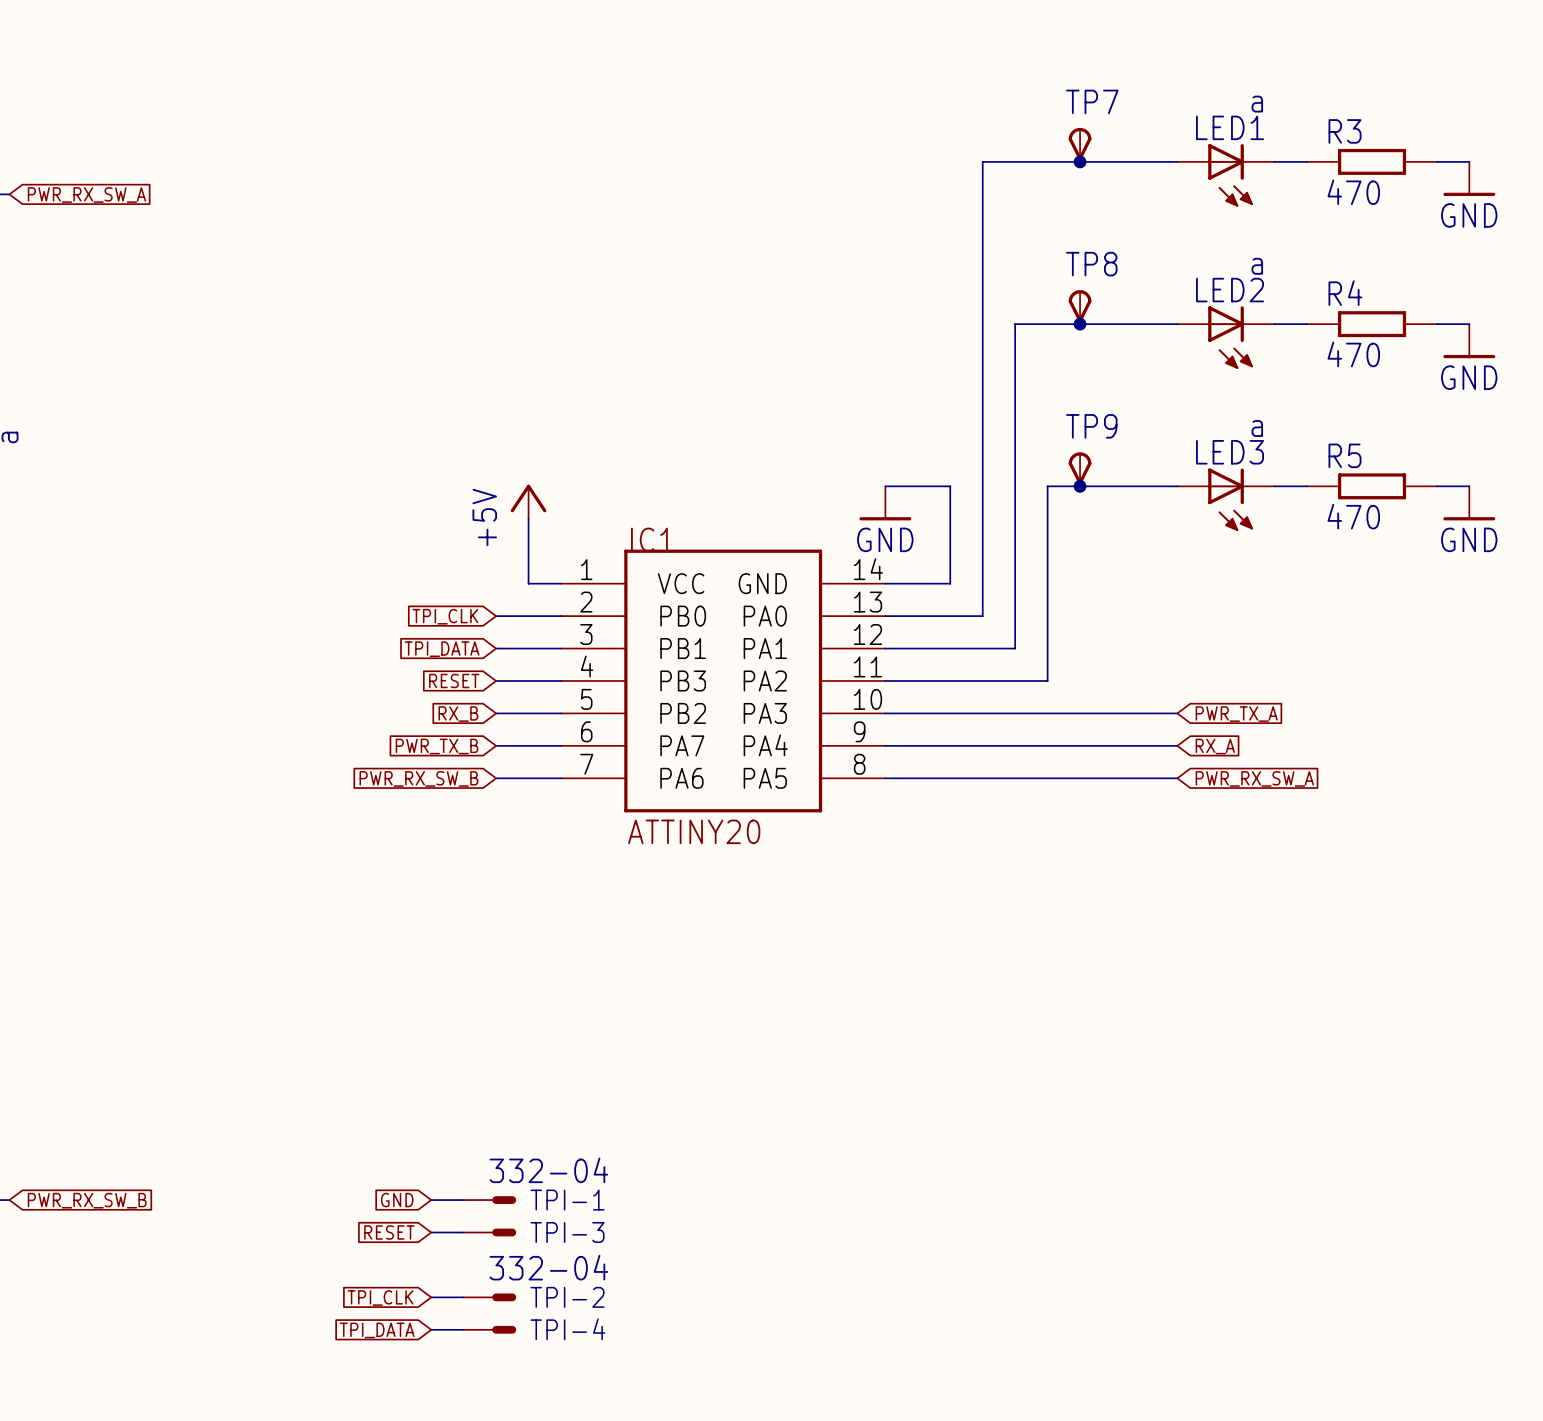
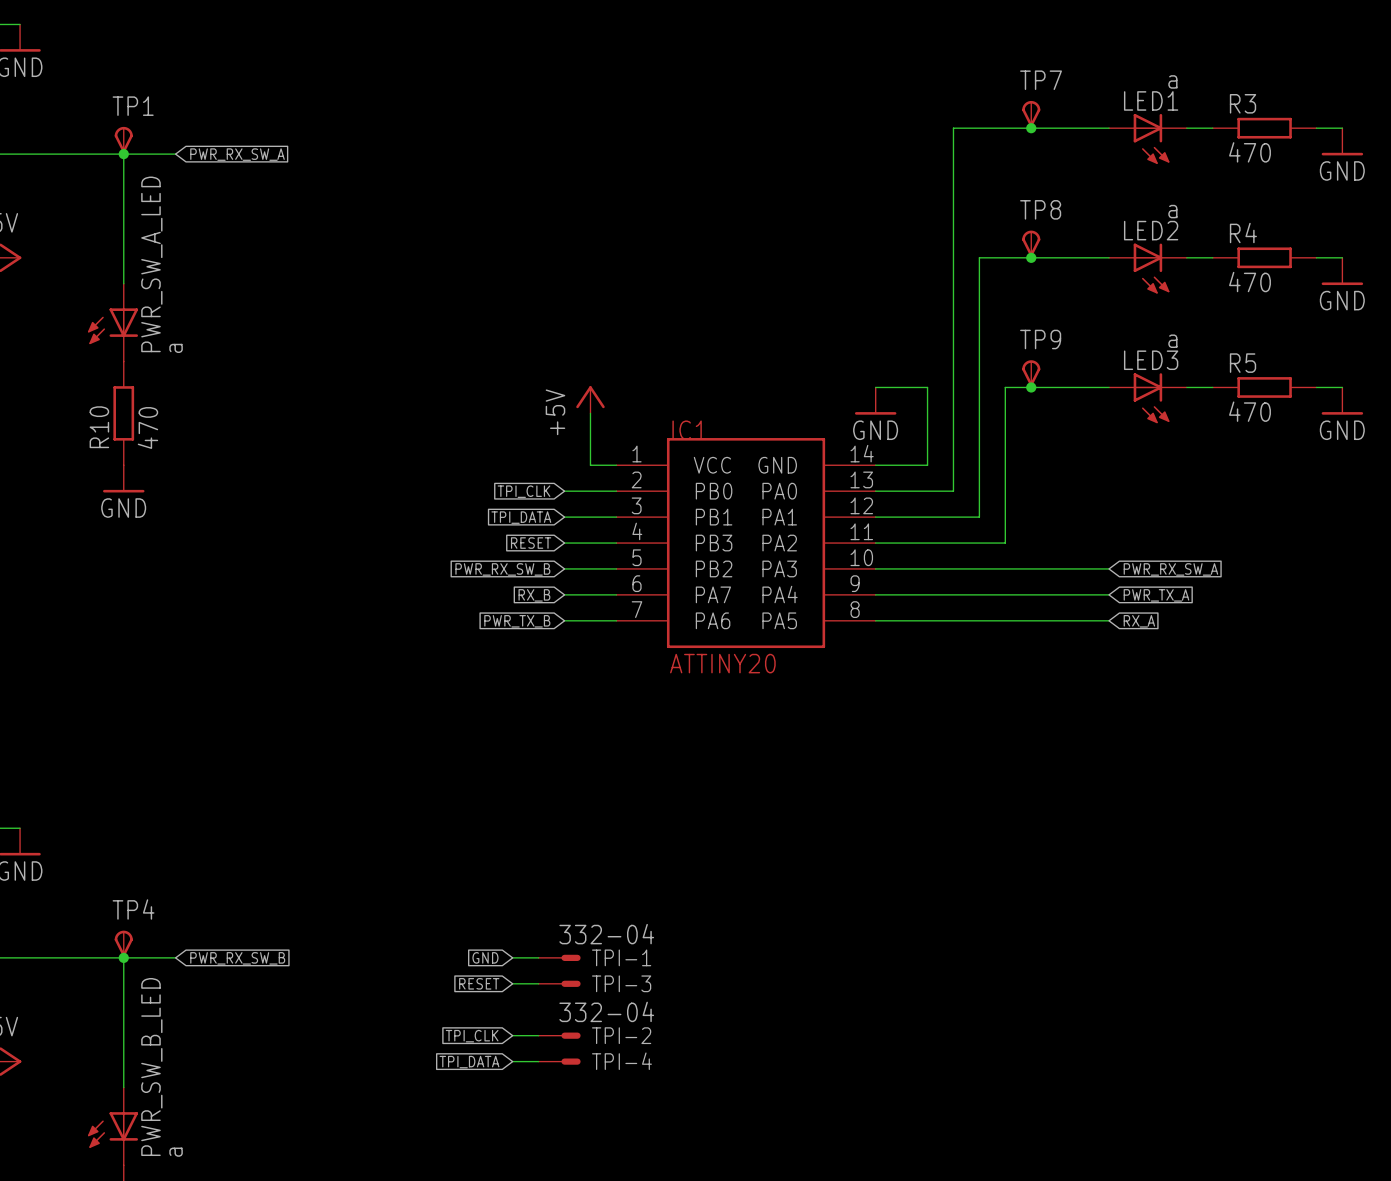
global label: RX_B (458, 714) -> PWR_RX_SW_B (502, 569)
global label: PWR_TX_A (1236, 714) -> PWR_RX_SW_A (1170, 569)
global label: PWR_TX_B (437, 746) -> RX_B (534, 595)
global label: RX_A (1215, 746) -> PWR_TX_A (1156, 595)
global label: PWR_RX_SW_B (418, 778) -> PWR_TX_B (517, 621)
global label: PWR_RX_SW_A (1254, 778) -> RX_A (1139, 621)

